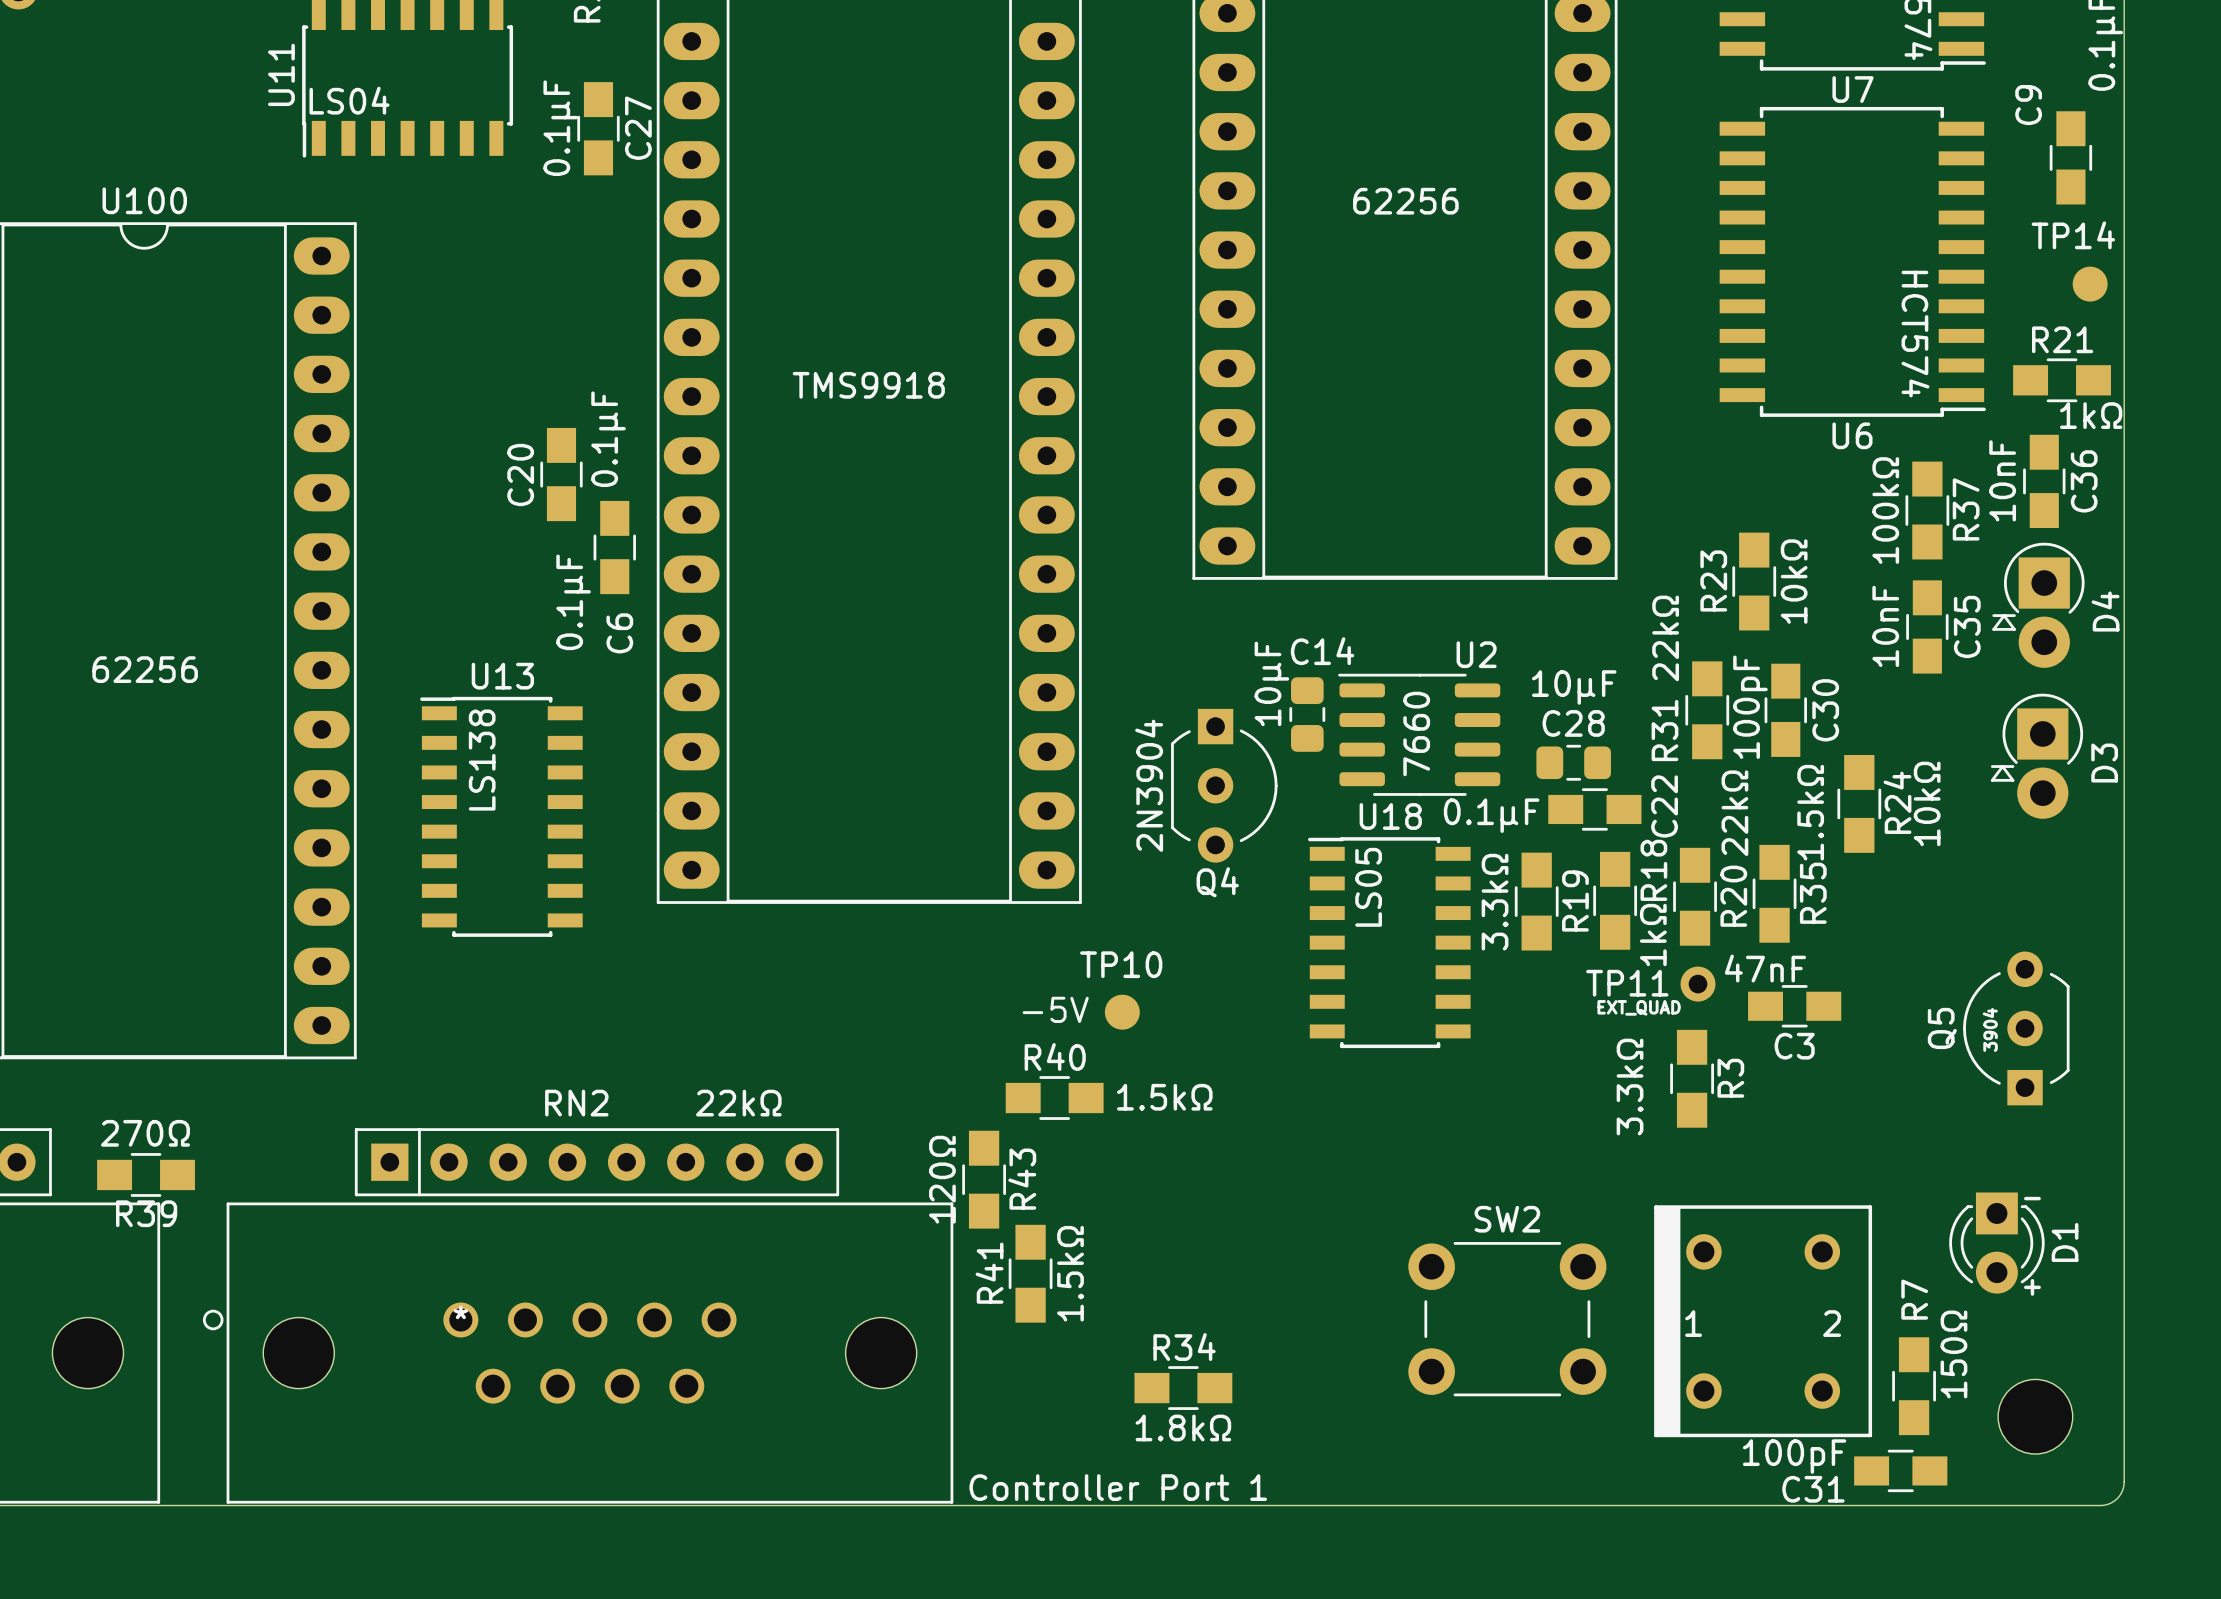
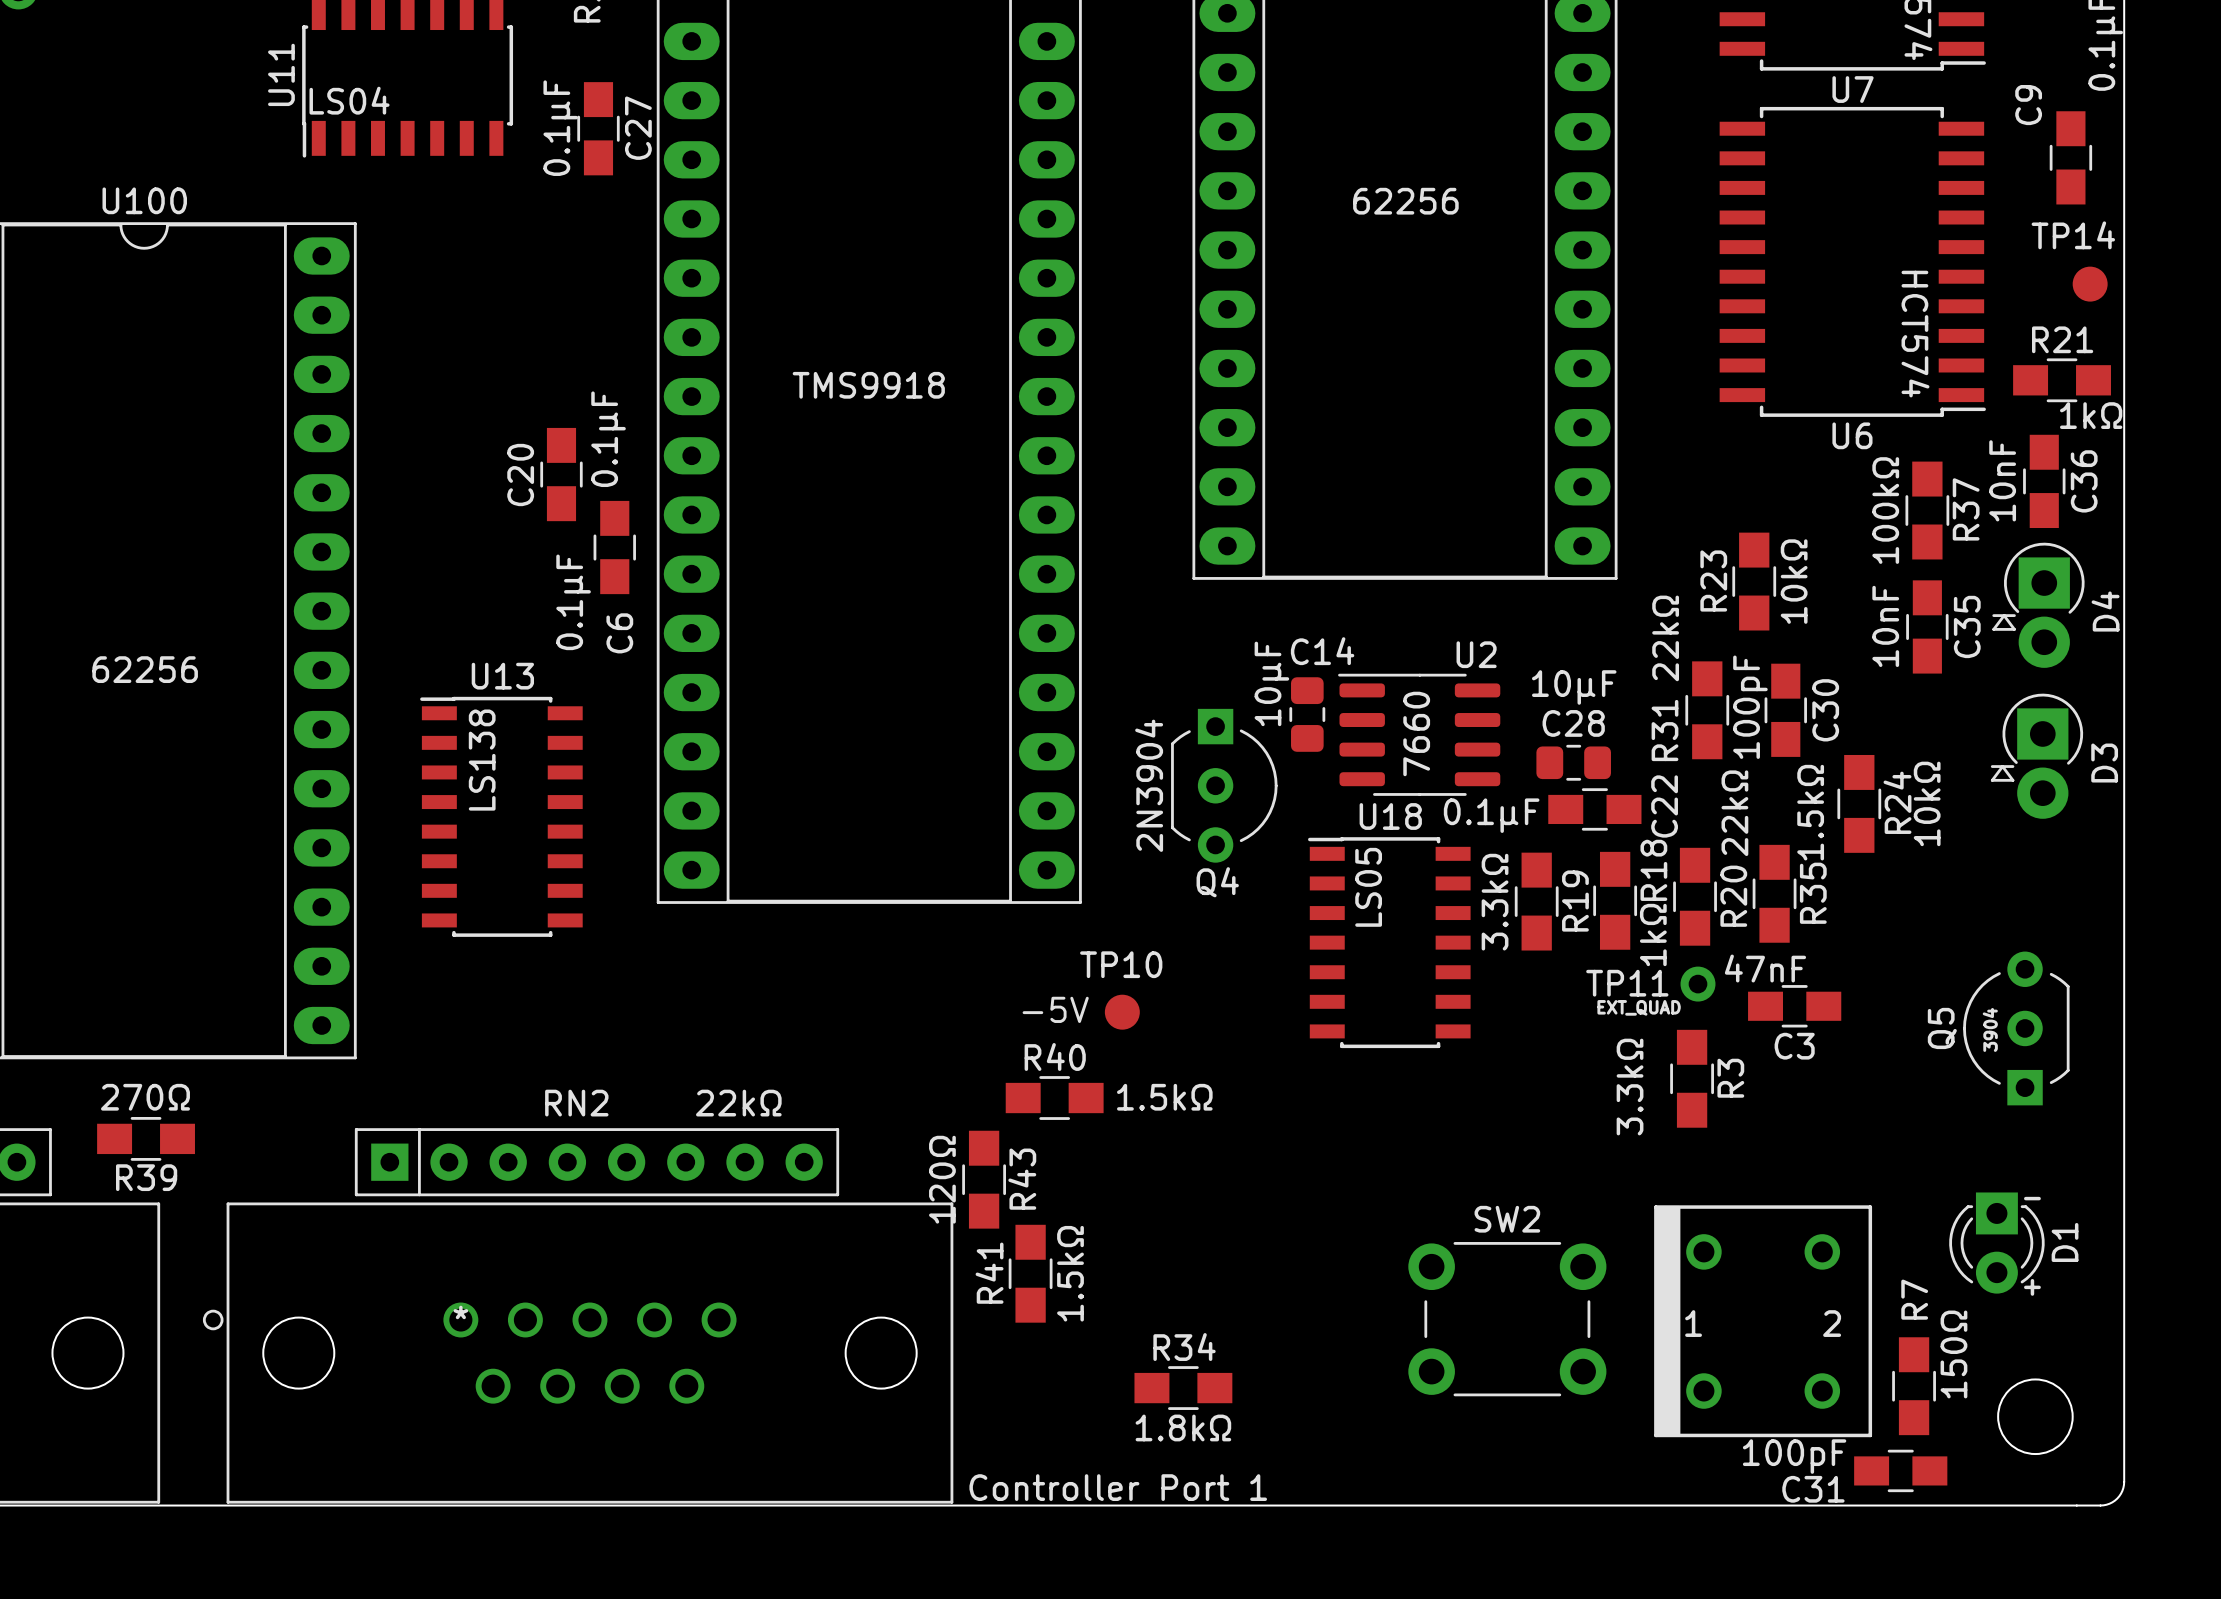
R39 position: (146, 1174) -> (146, 1138)

